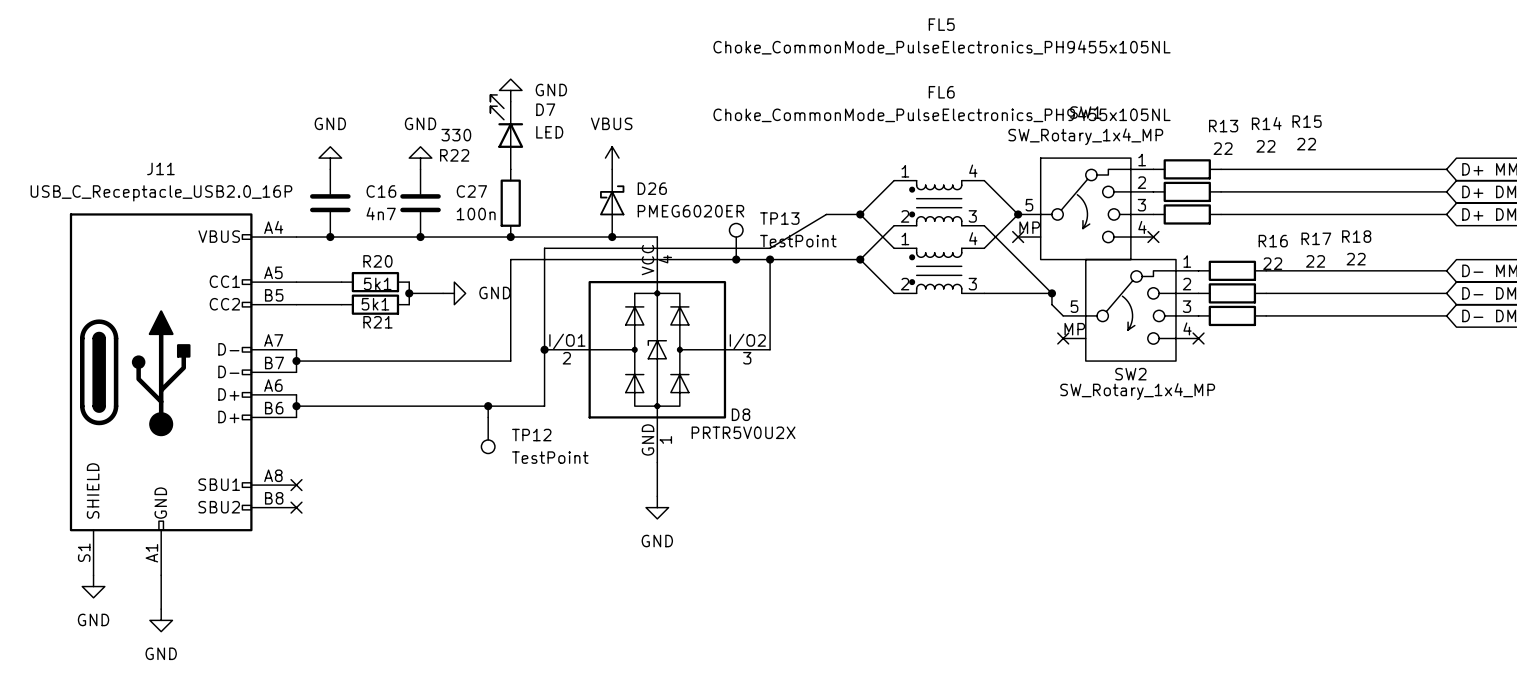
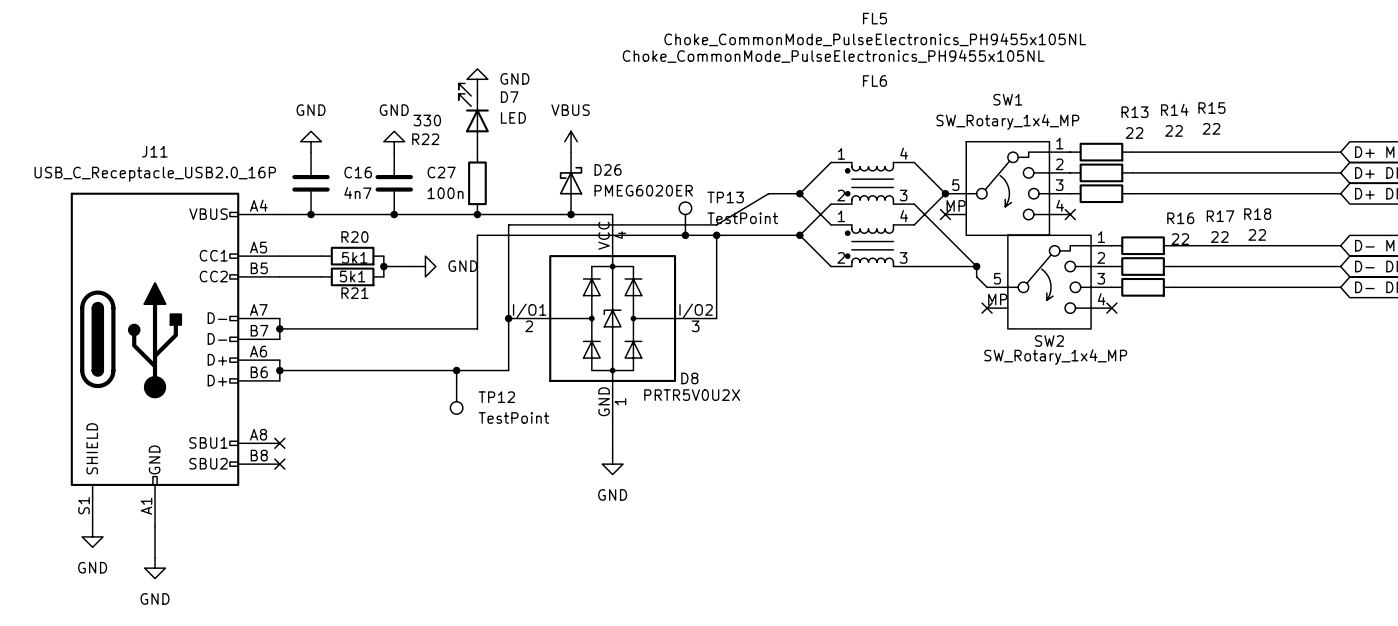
FL6 value position: Choke_CommonMode_PulseElectronics_PH9455x105NL (942, 115) -> Choke_CommonMode_PulseElectronics_PH9455x105NL (833, 56)

